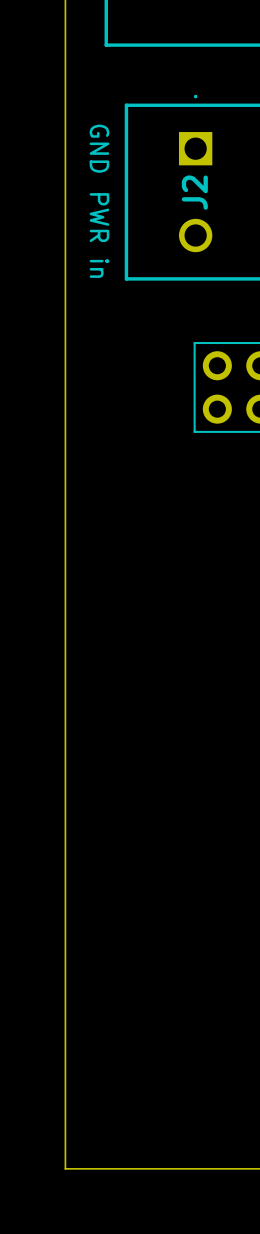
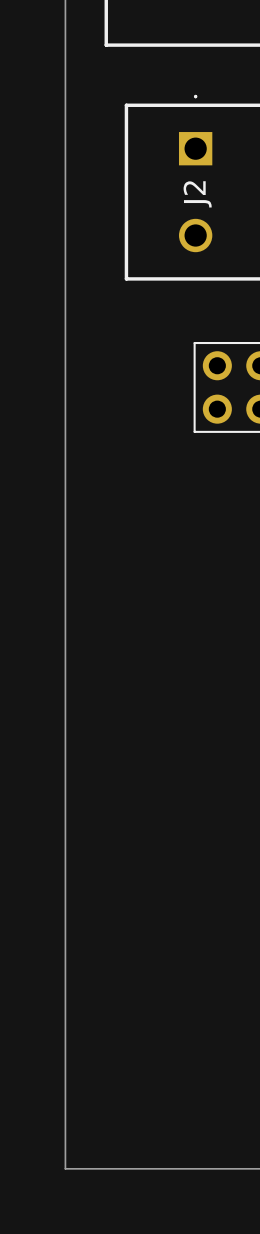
text: GND (99, 148) -> none
text: PWR in (99, 235) -> none

